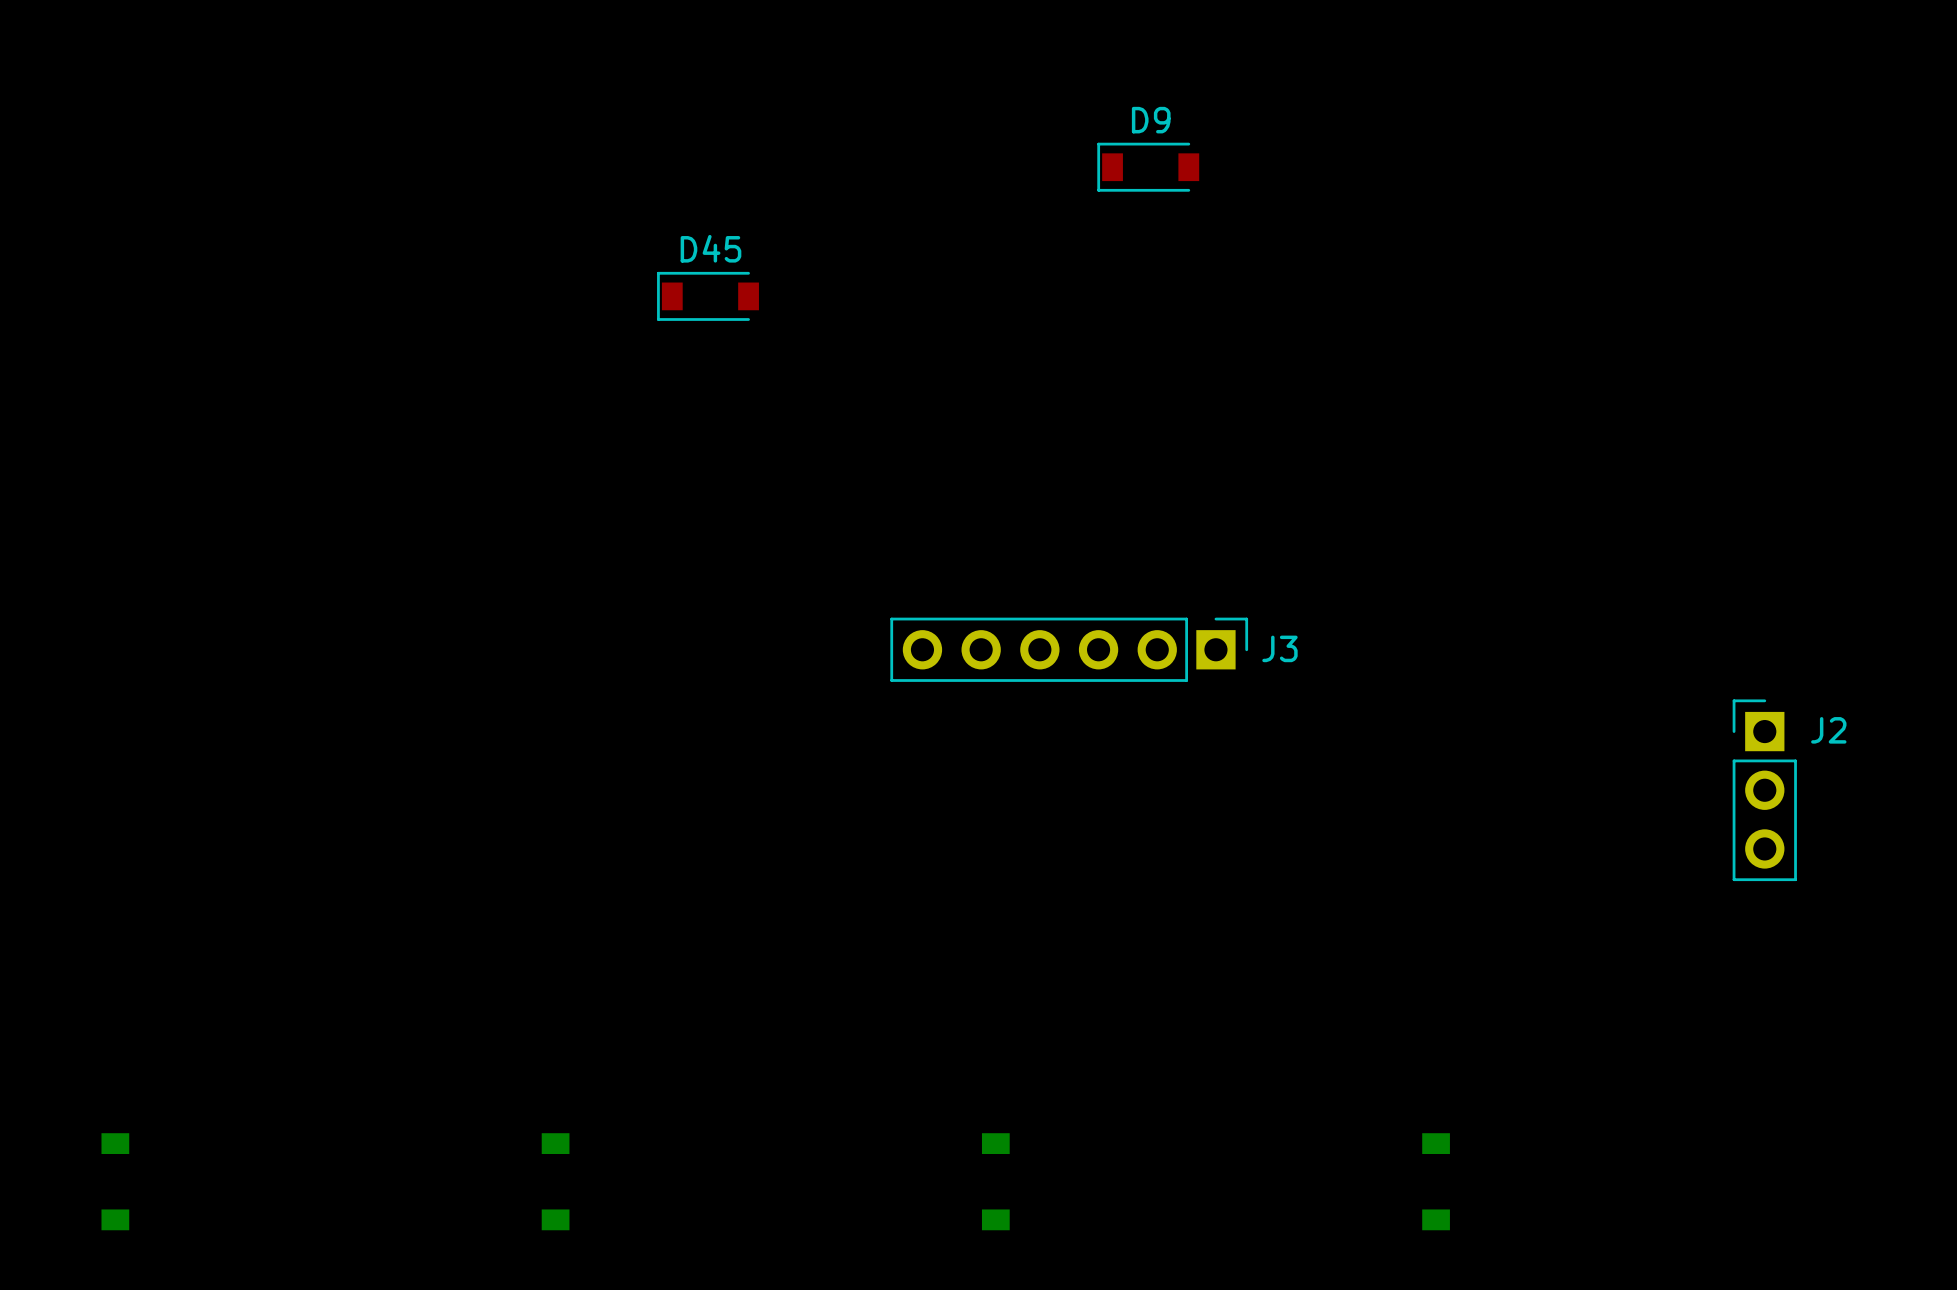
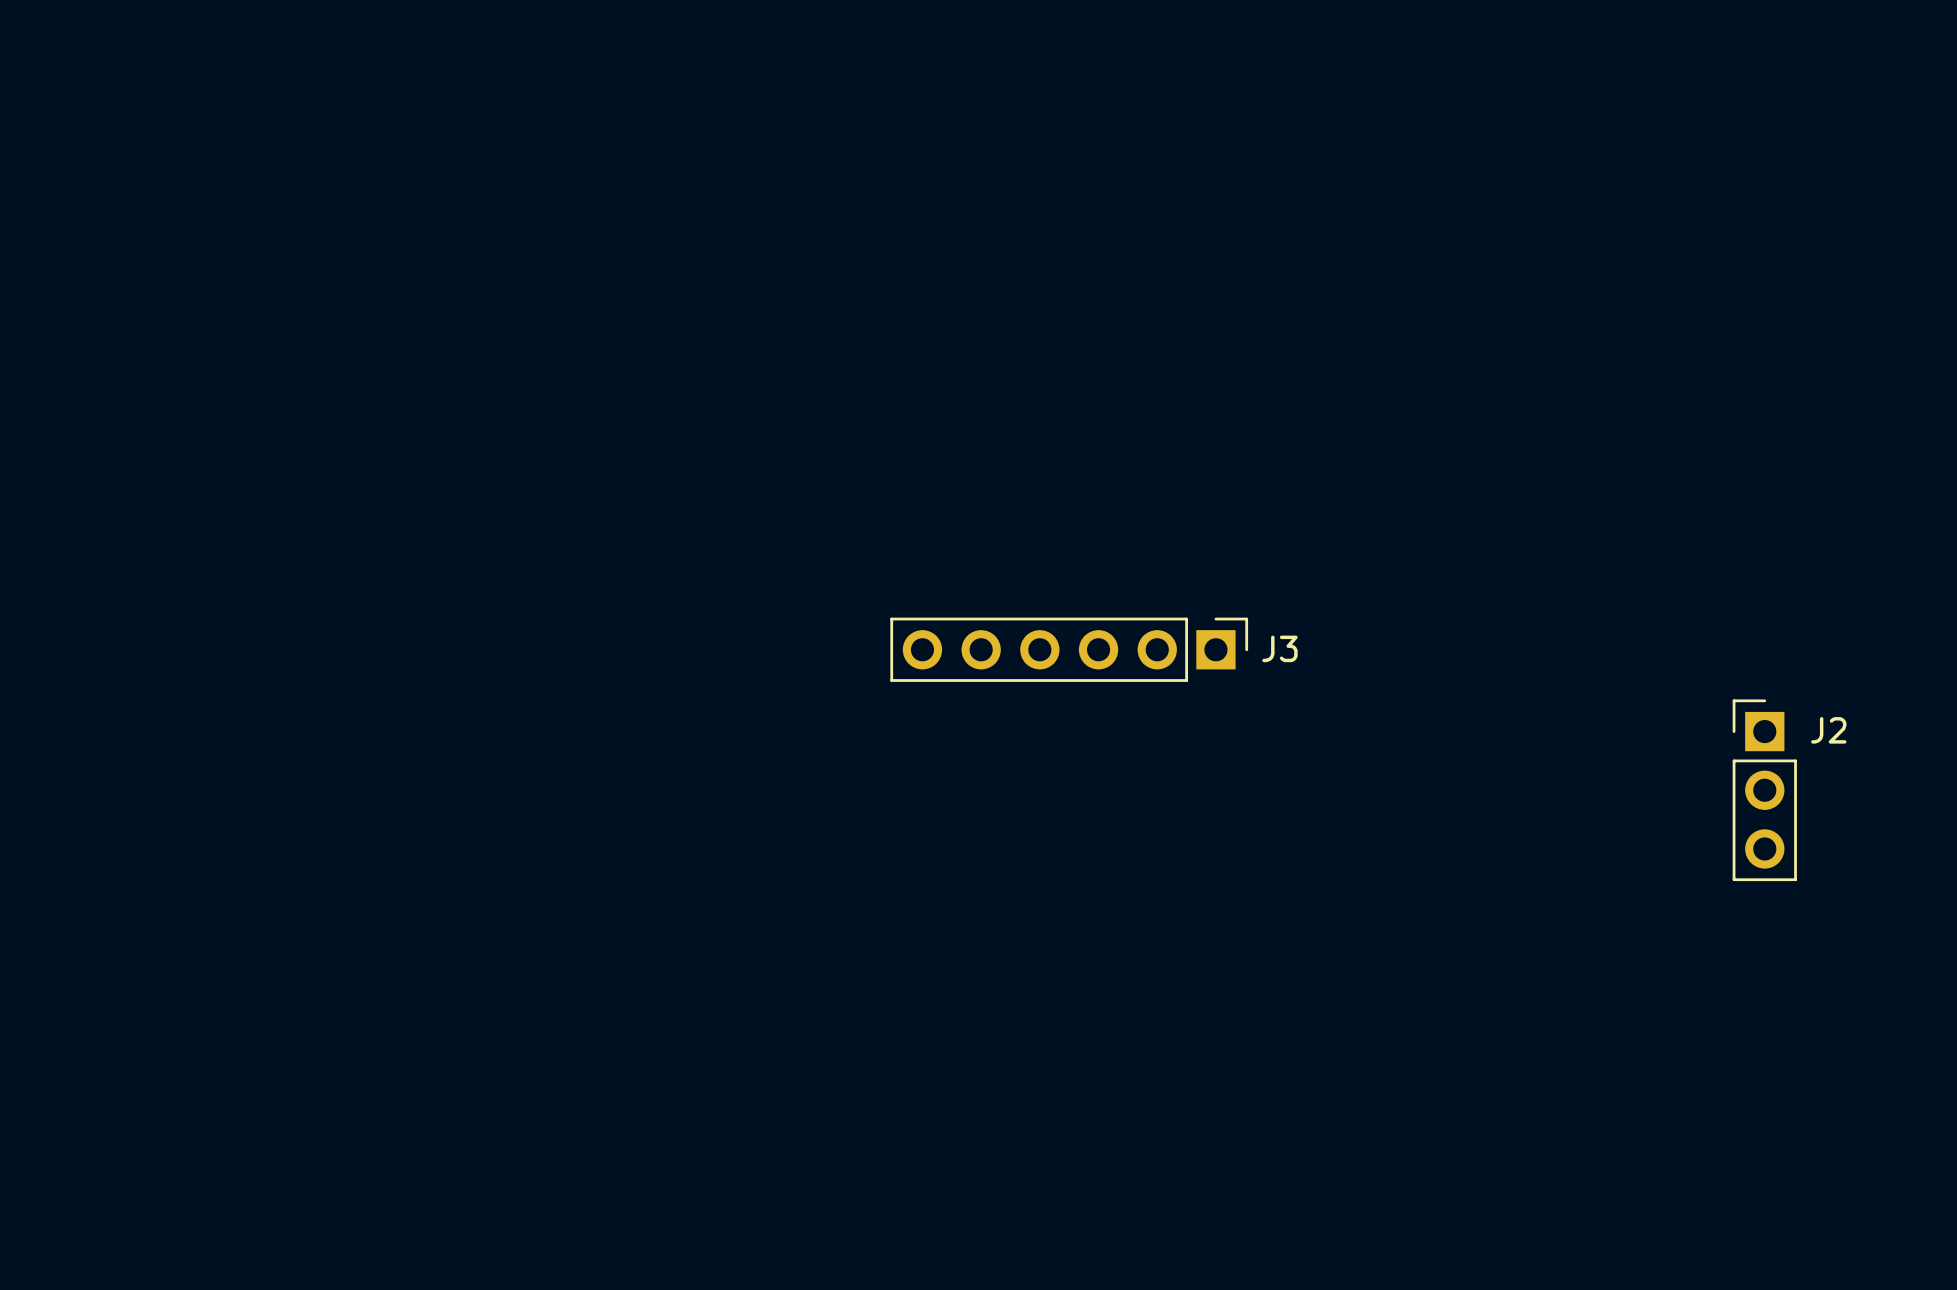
D9: (1148, 167) -> none
D45: (708, 296) -> none
part: (115, 1181) -> none
part: (555, 1181) -> none
part: (995, 1181) -> none
part: (1436, 1181) -> none

